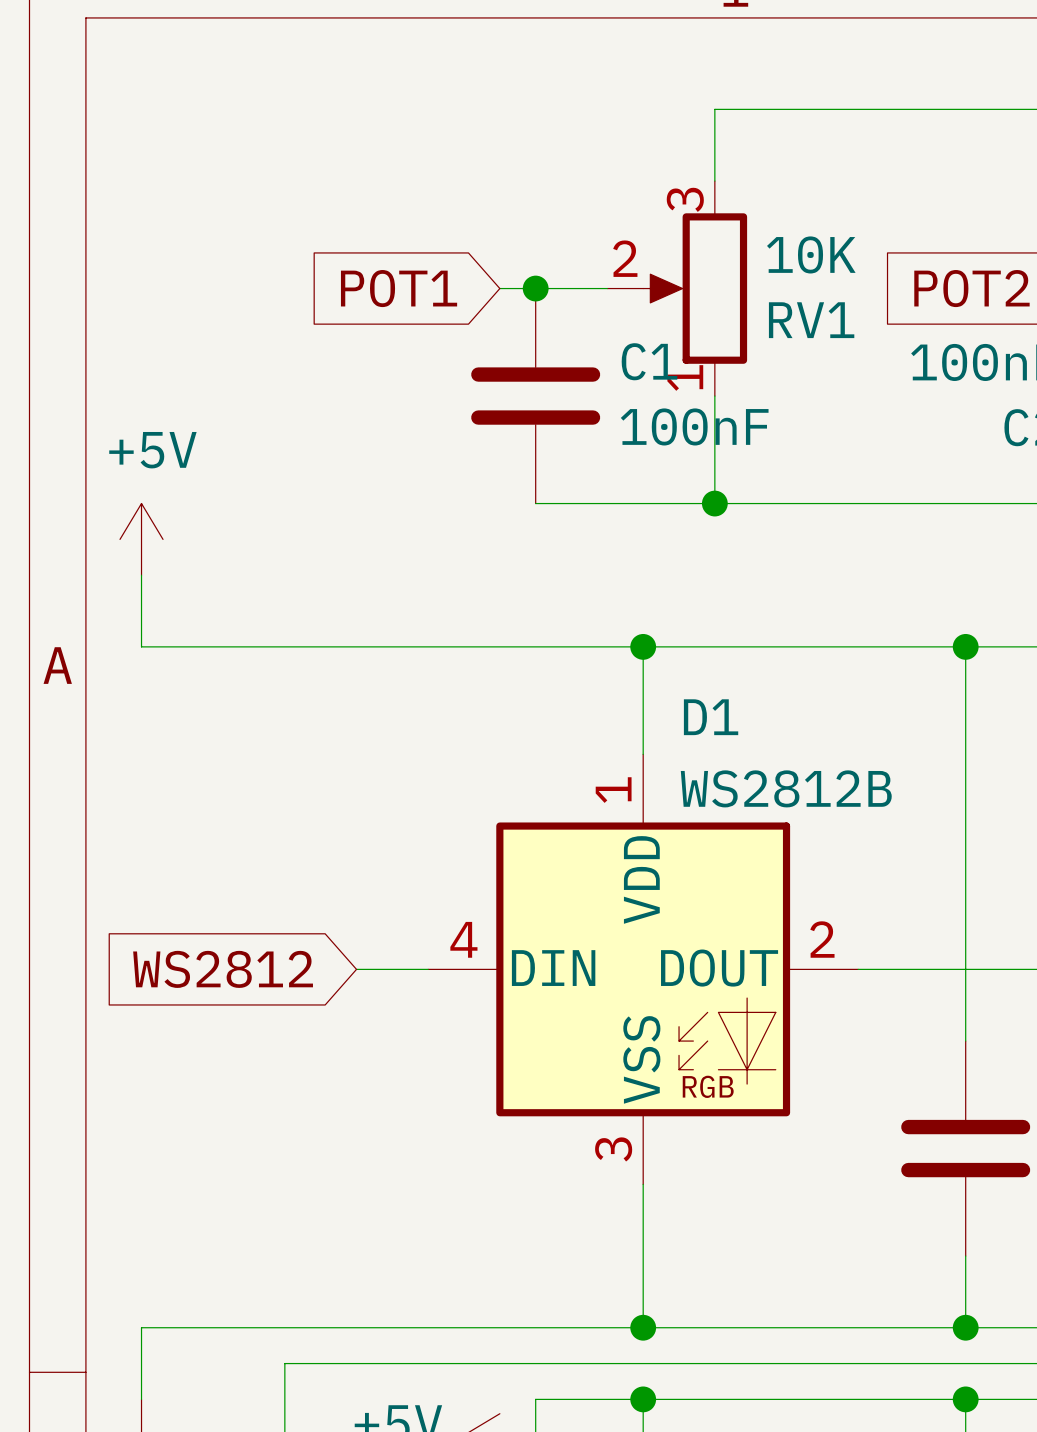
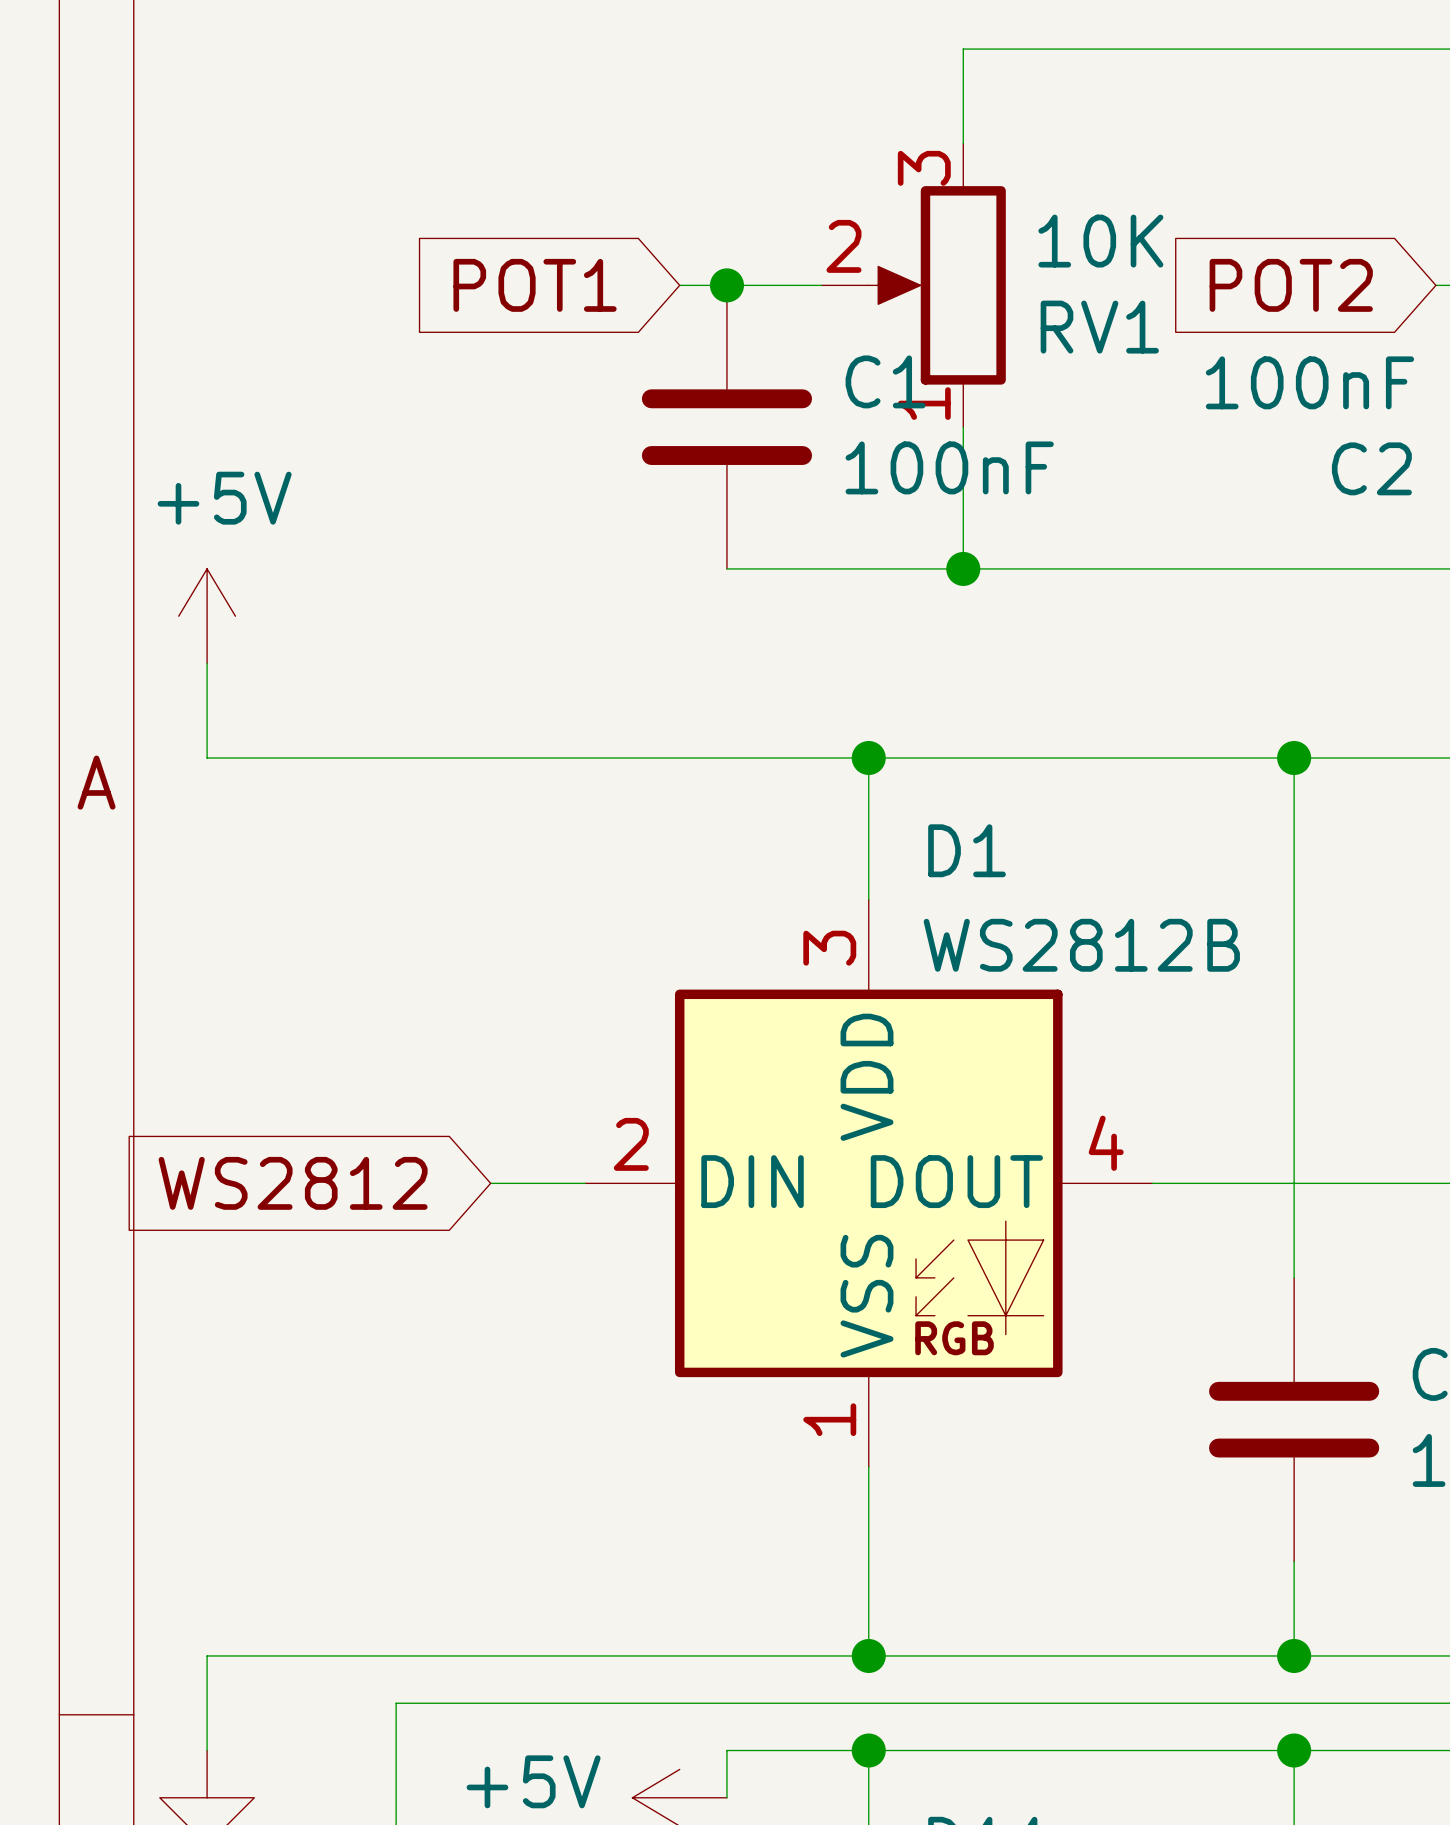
D1 pin number: 1 (613, 790) -> 3 (829, 948)
D1 pin number: 4 (463, 939) -> 2 (631, 1144)
D1 pin number: 2 (822, 939) -> 4 (1106, 1143)
D1 pin number: 3 (613, 1149) -> 1 (829, 1419)

